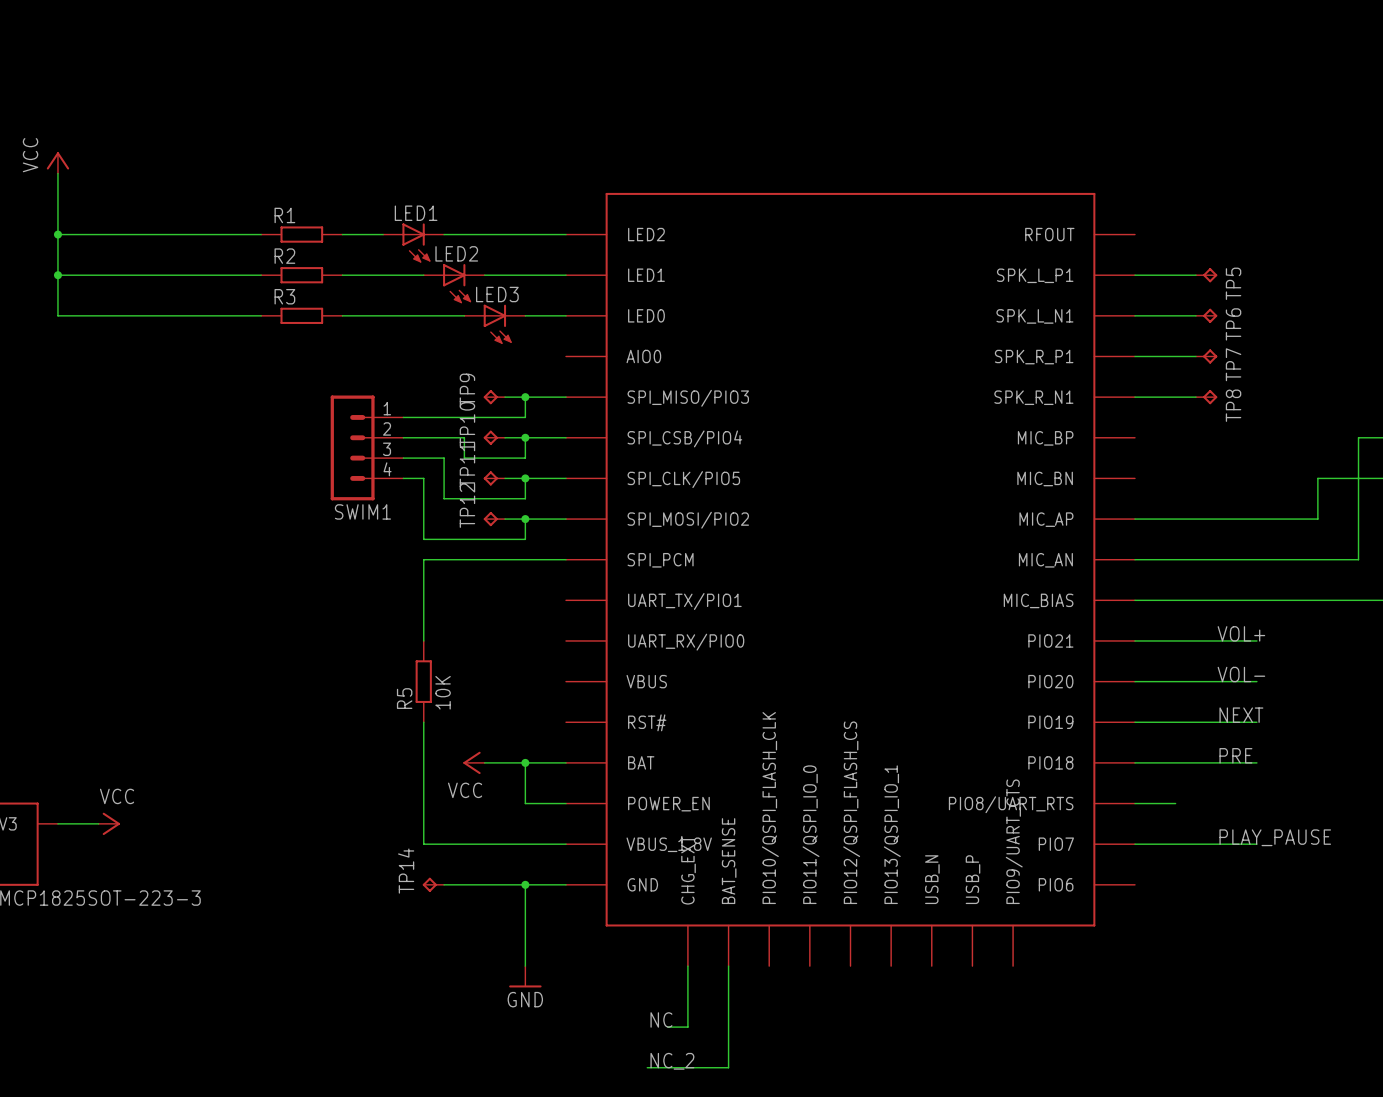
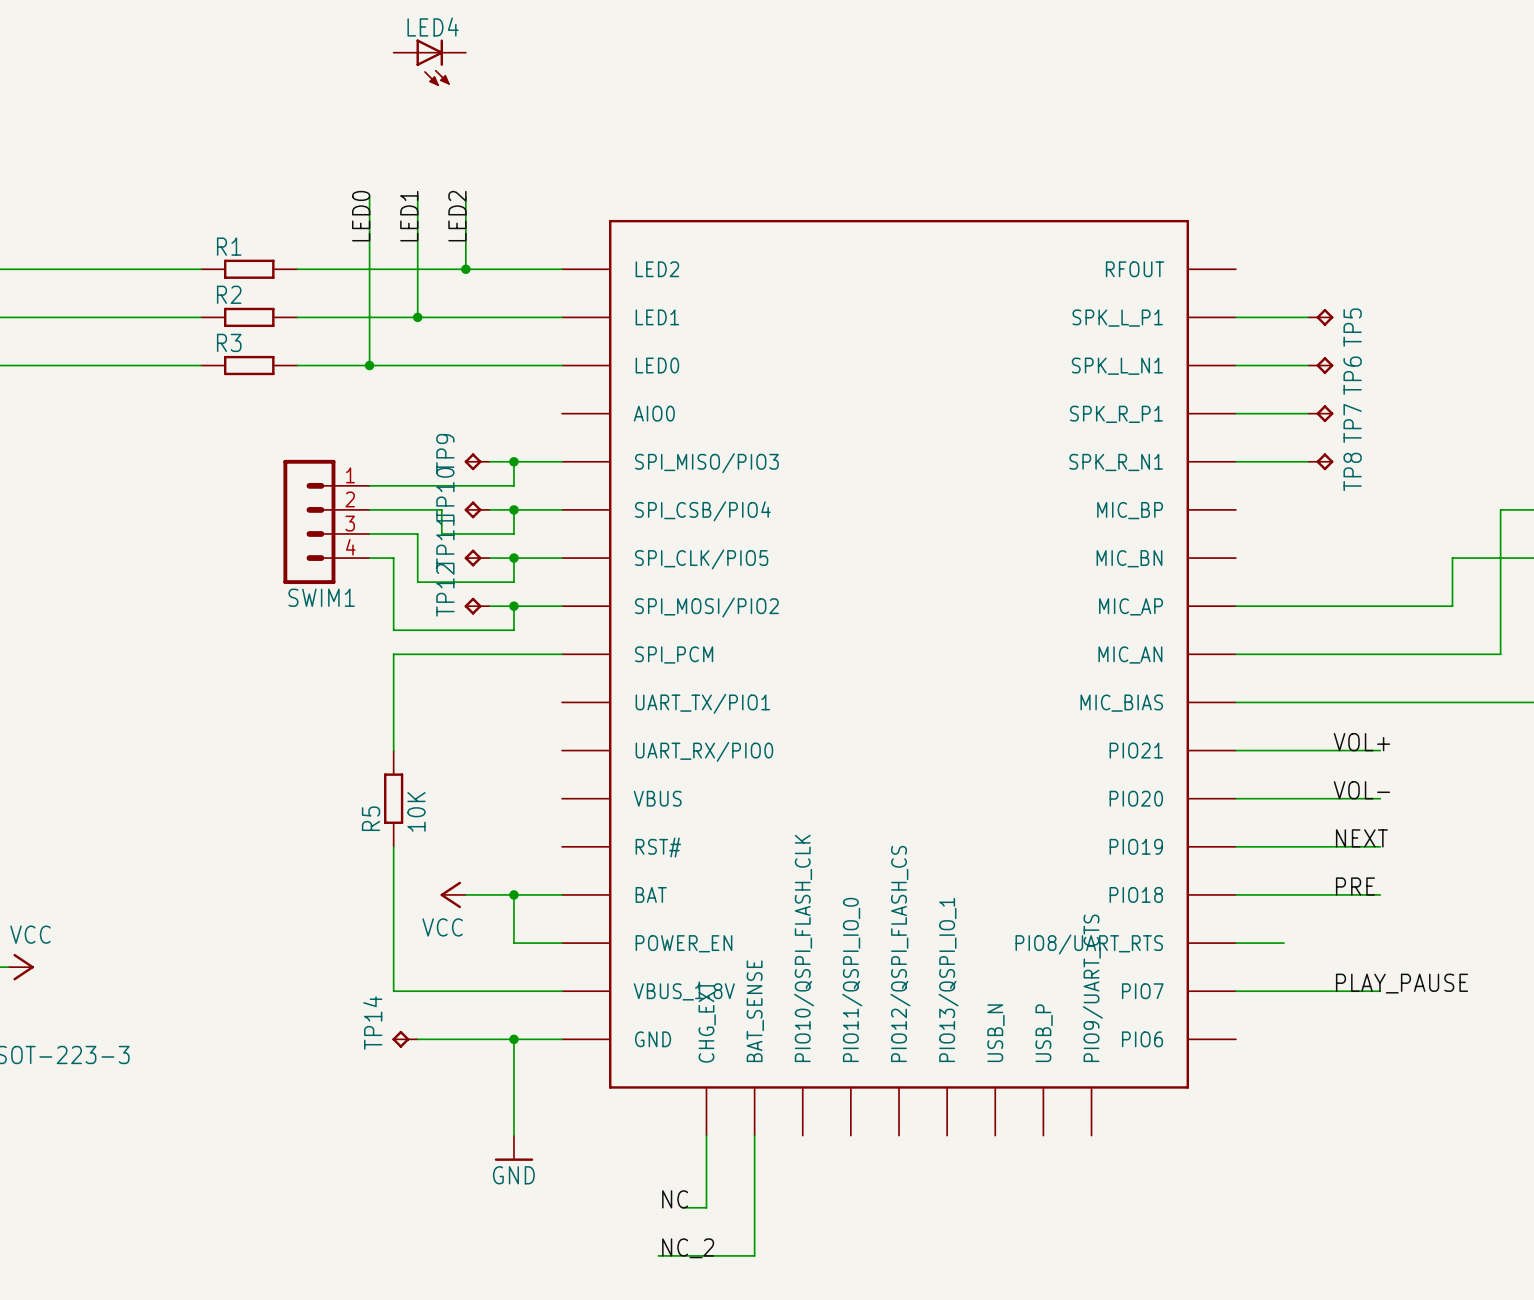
LED4: none -> (429, 62)
wire: none -> (369, 197) (369, 365)
wire: none -> (417, 197) (417, 317)
wire: none -> (465, 197) (465, 269)
label: none -> LED0 (361, 216)
label: none -> LED1 (409, 216)
label: none -> LED2 (457, 216)
junction: none -> (465, 269)
LED1: (413, 242) -> none
junction: none -> (417, 317)
LED2: (454, 283) -> none
junction: none -> (369, 365)
LED3: (494, 324) -> none

